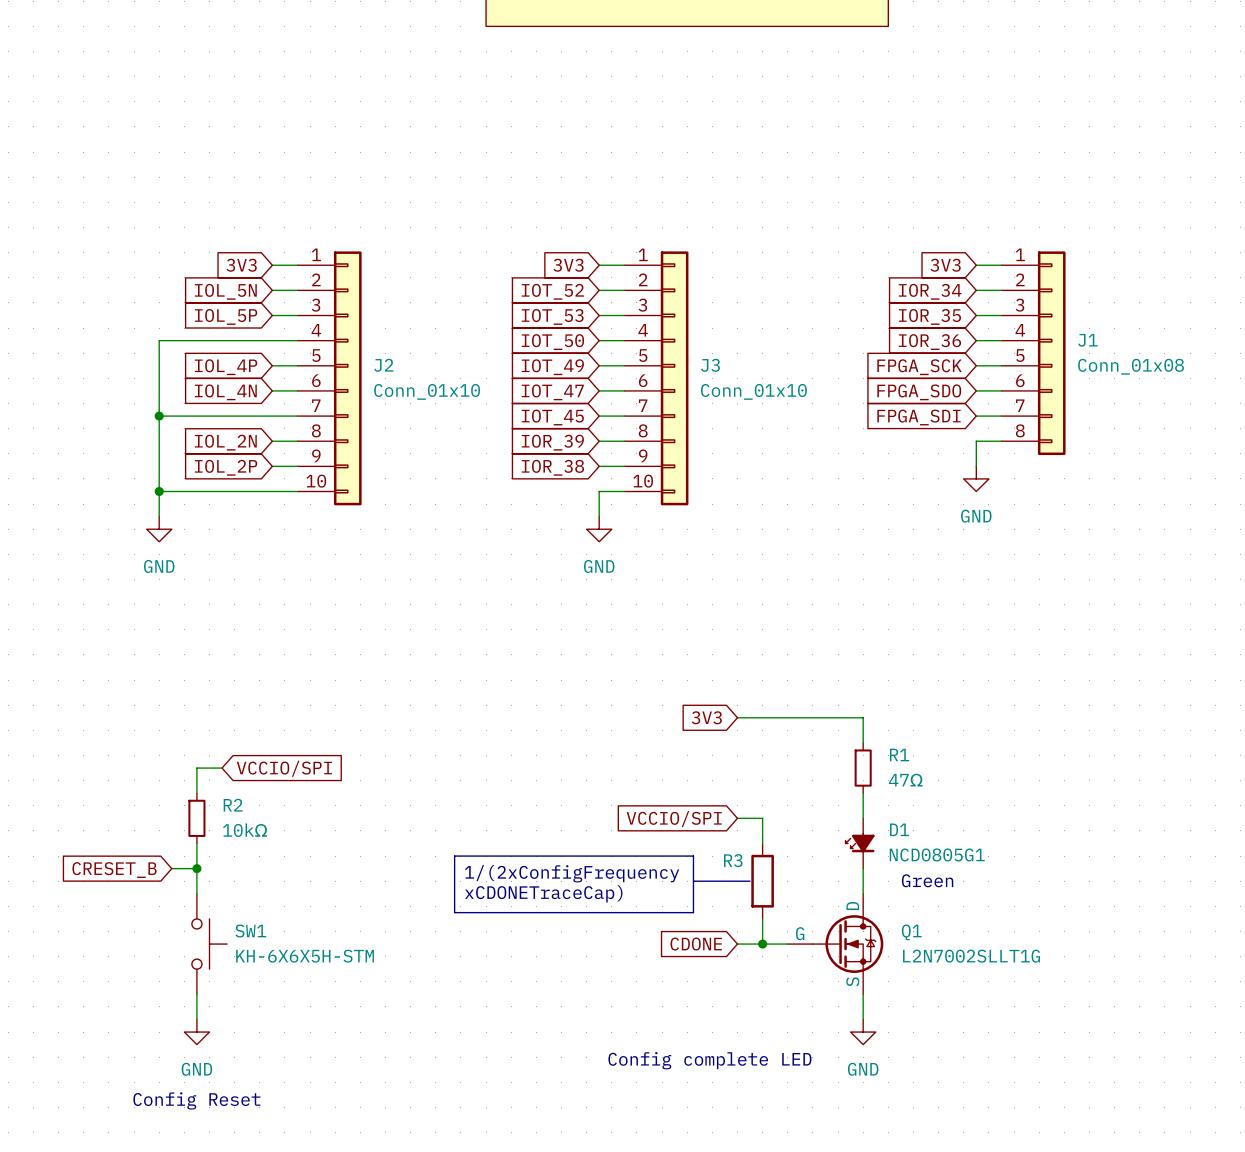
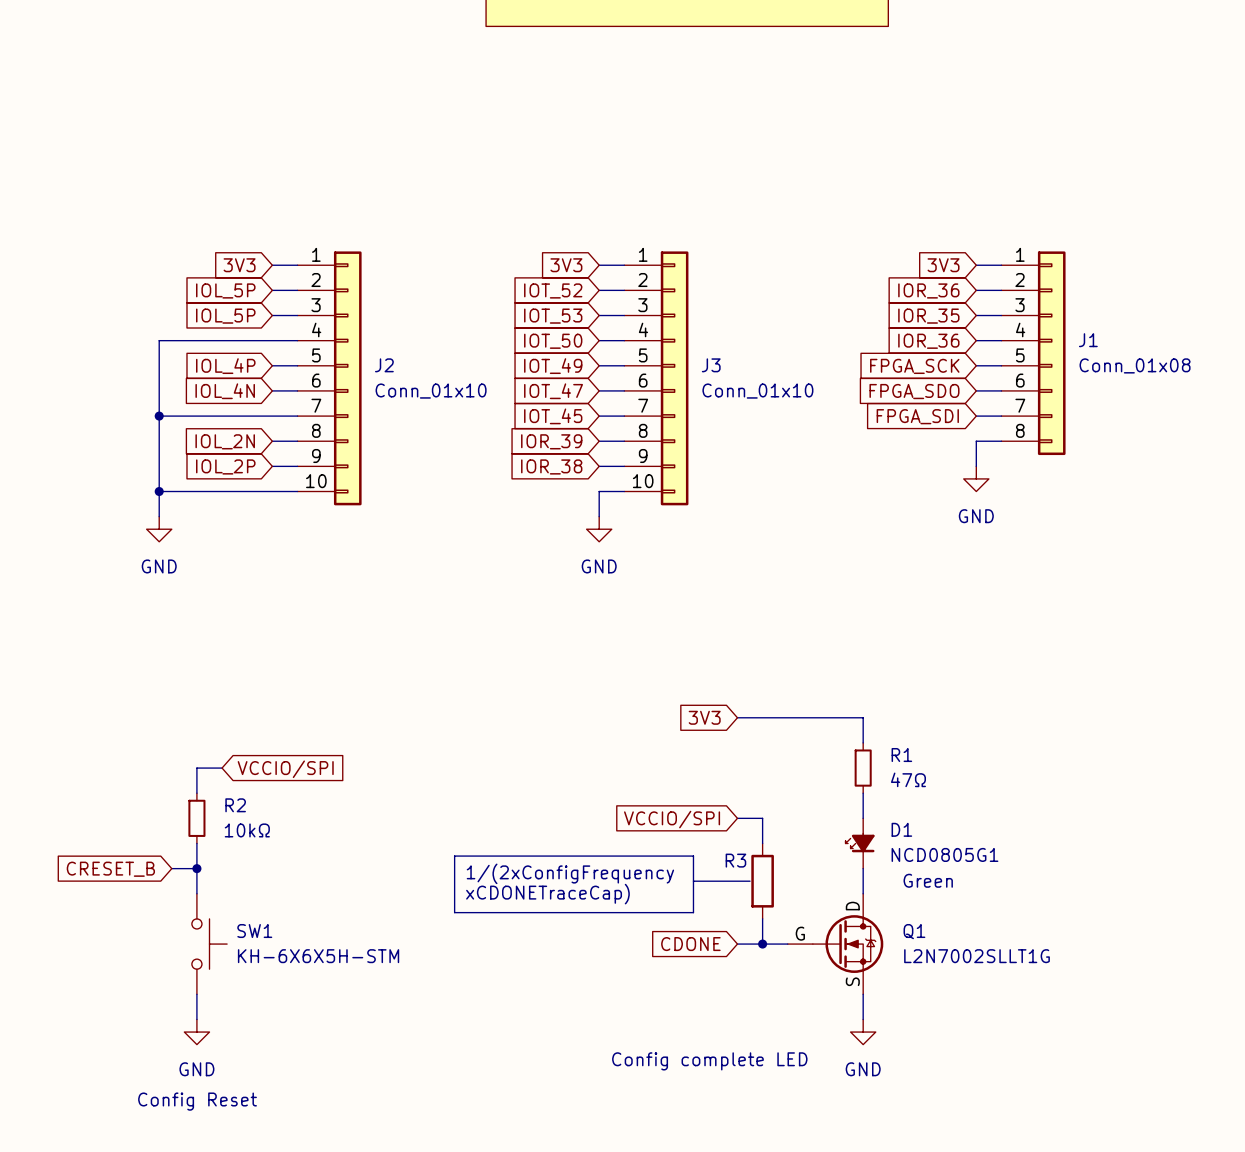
global label: IOL_5N (225, 291) -> IOL_5P (225, 290)
global label: IOR_34 (930, 291) -> IOR_36 (928, 290)

